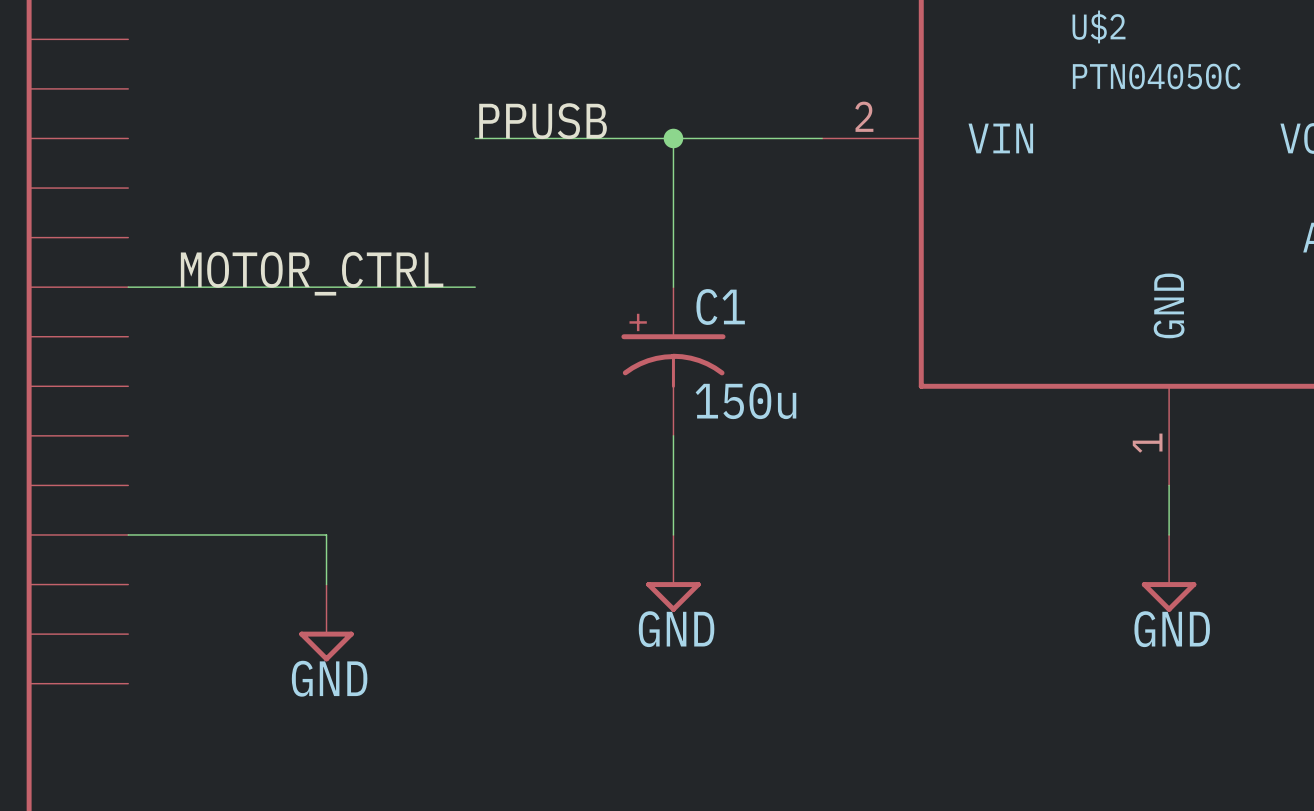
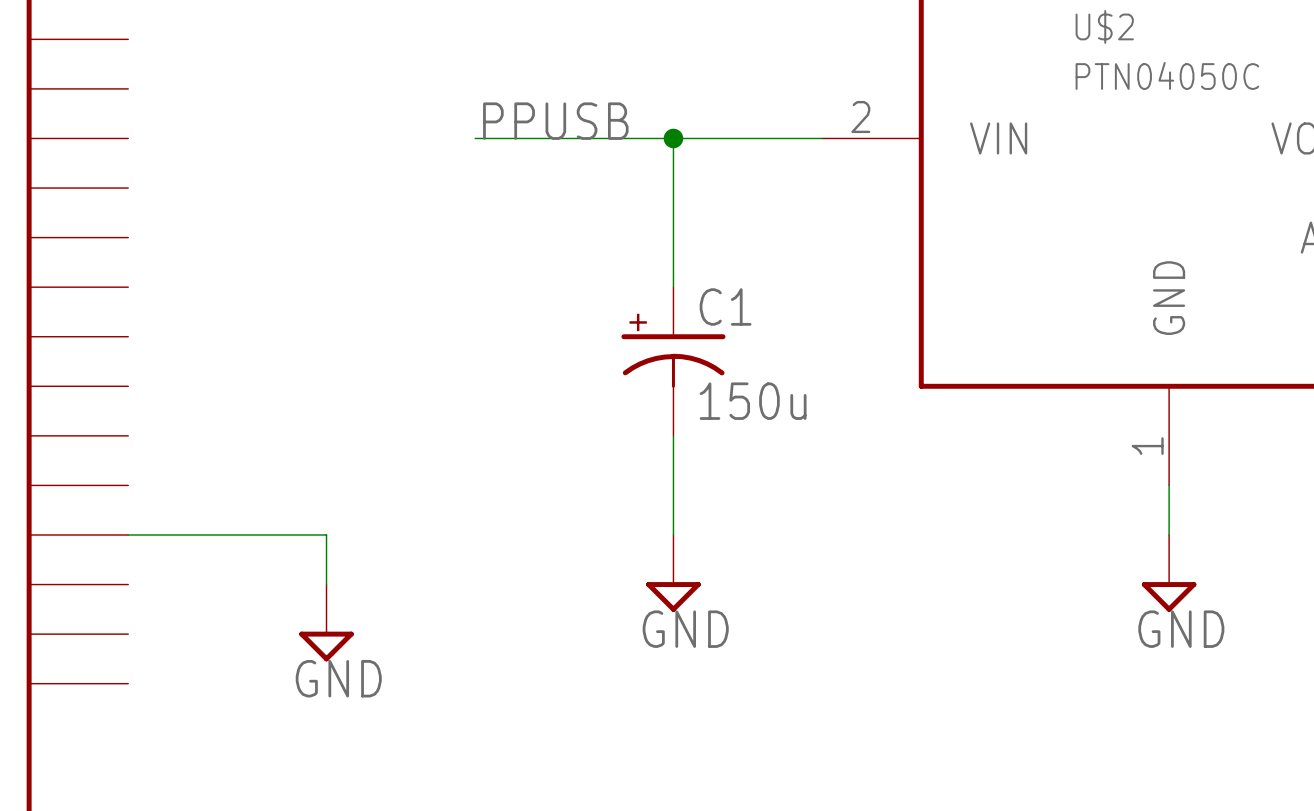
label: MOTOR_CTRL (312, 273) -> none
wire: (128, 287) (475, 287) -> none

